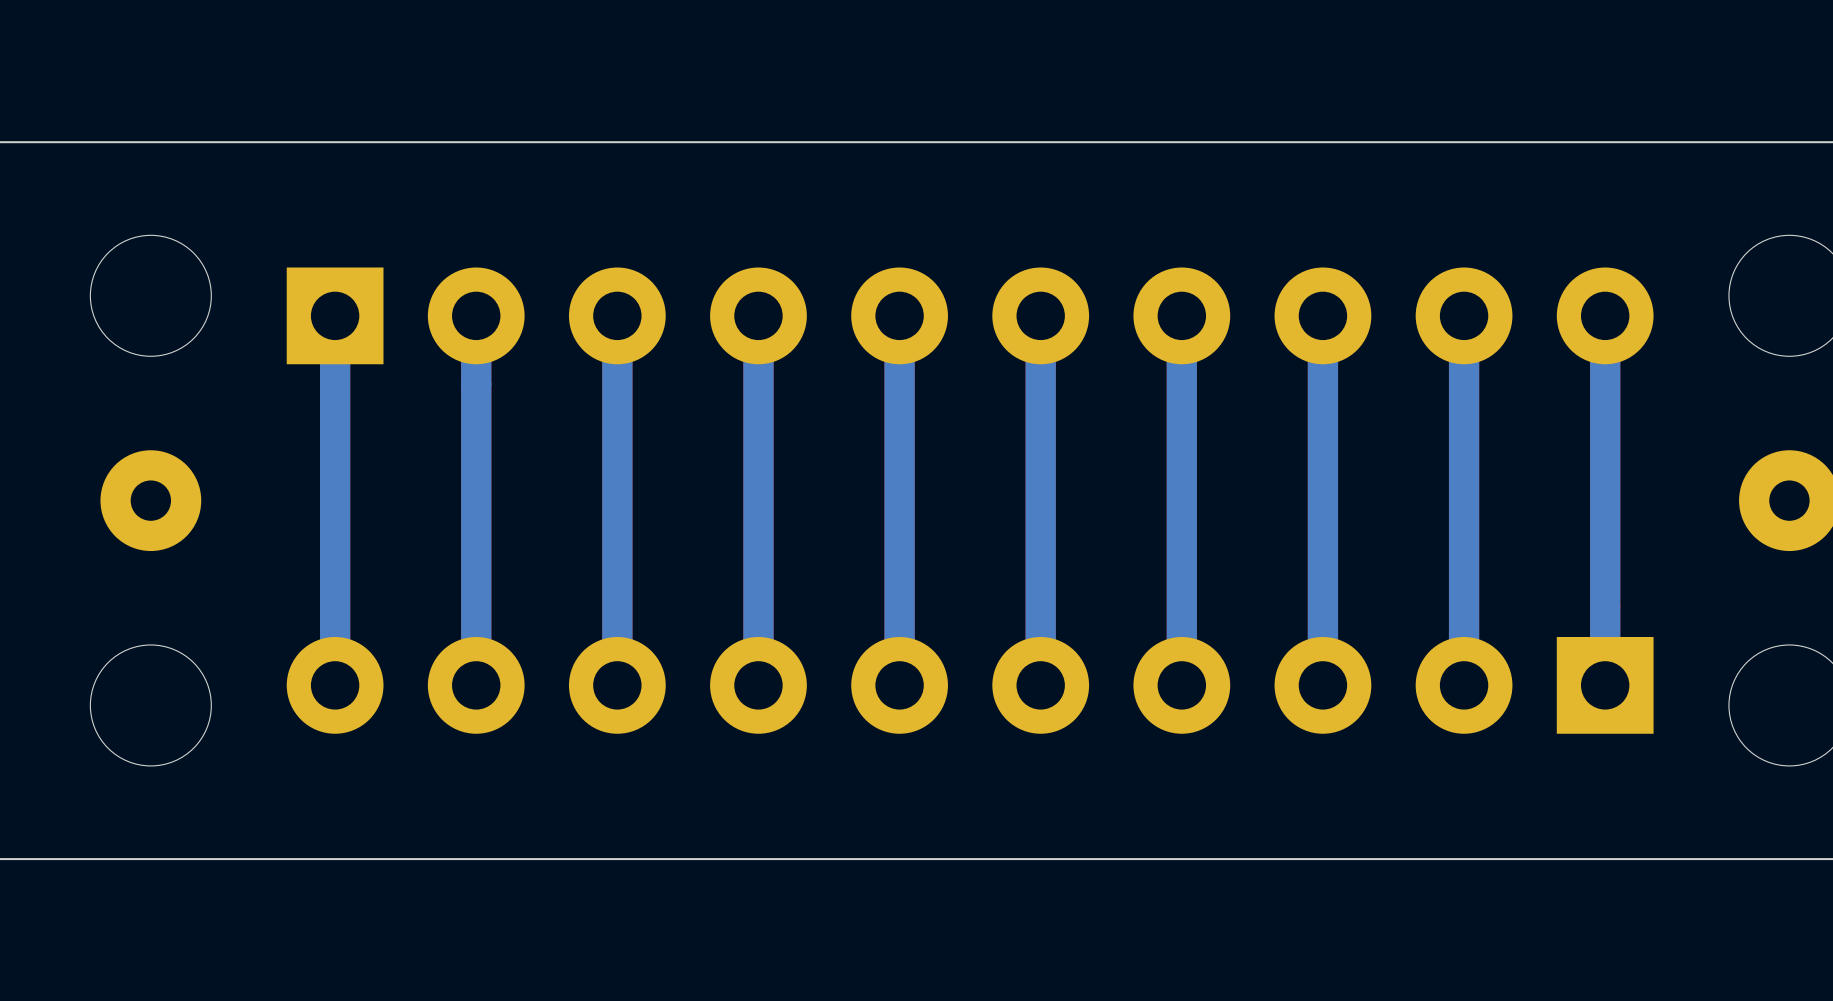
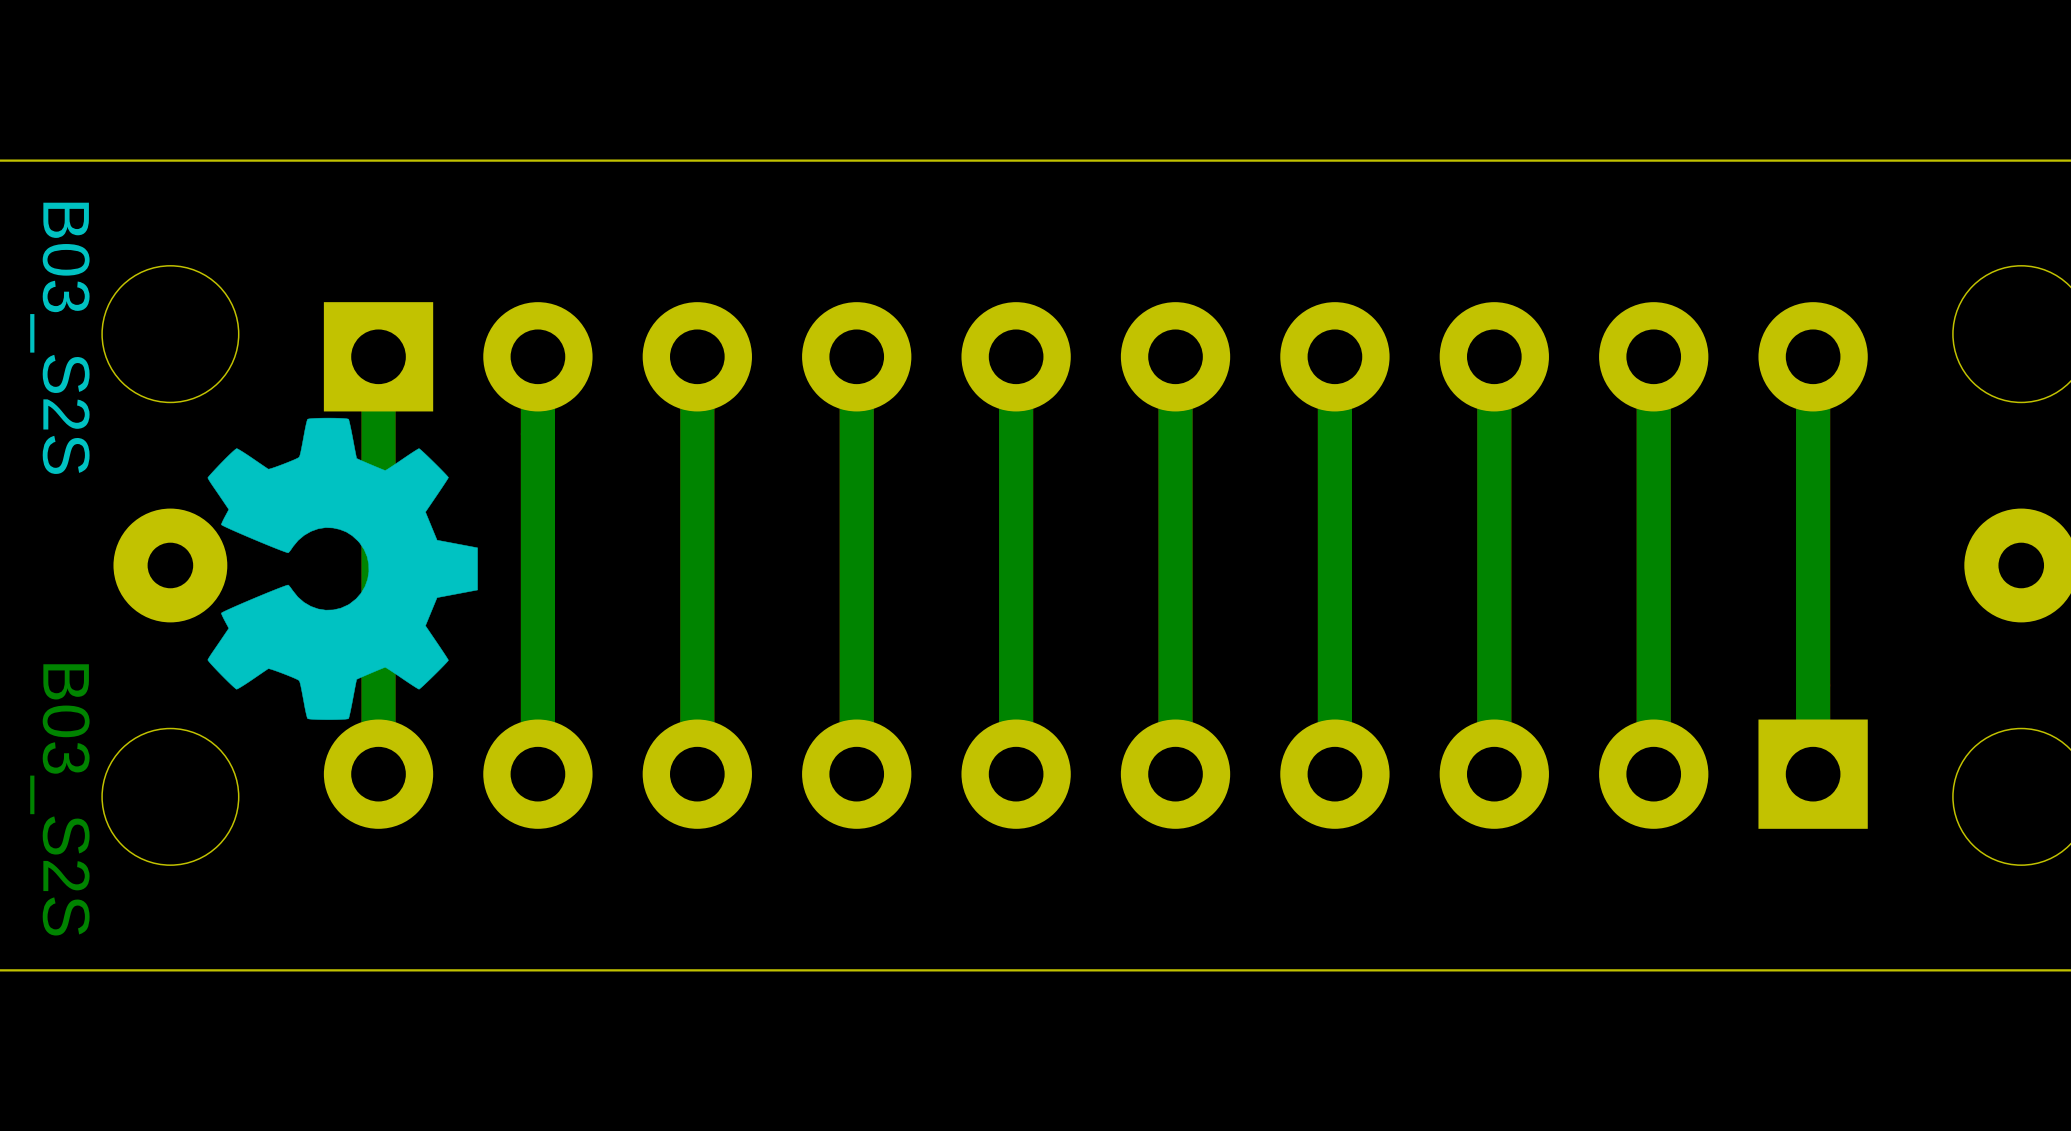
text: none -> B03_S2S (59, 338)
drawing: none -> [207, 417, 478, 720]
text: none -> B03_S2S (59, 799)

